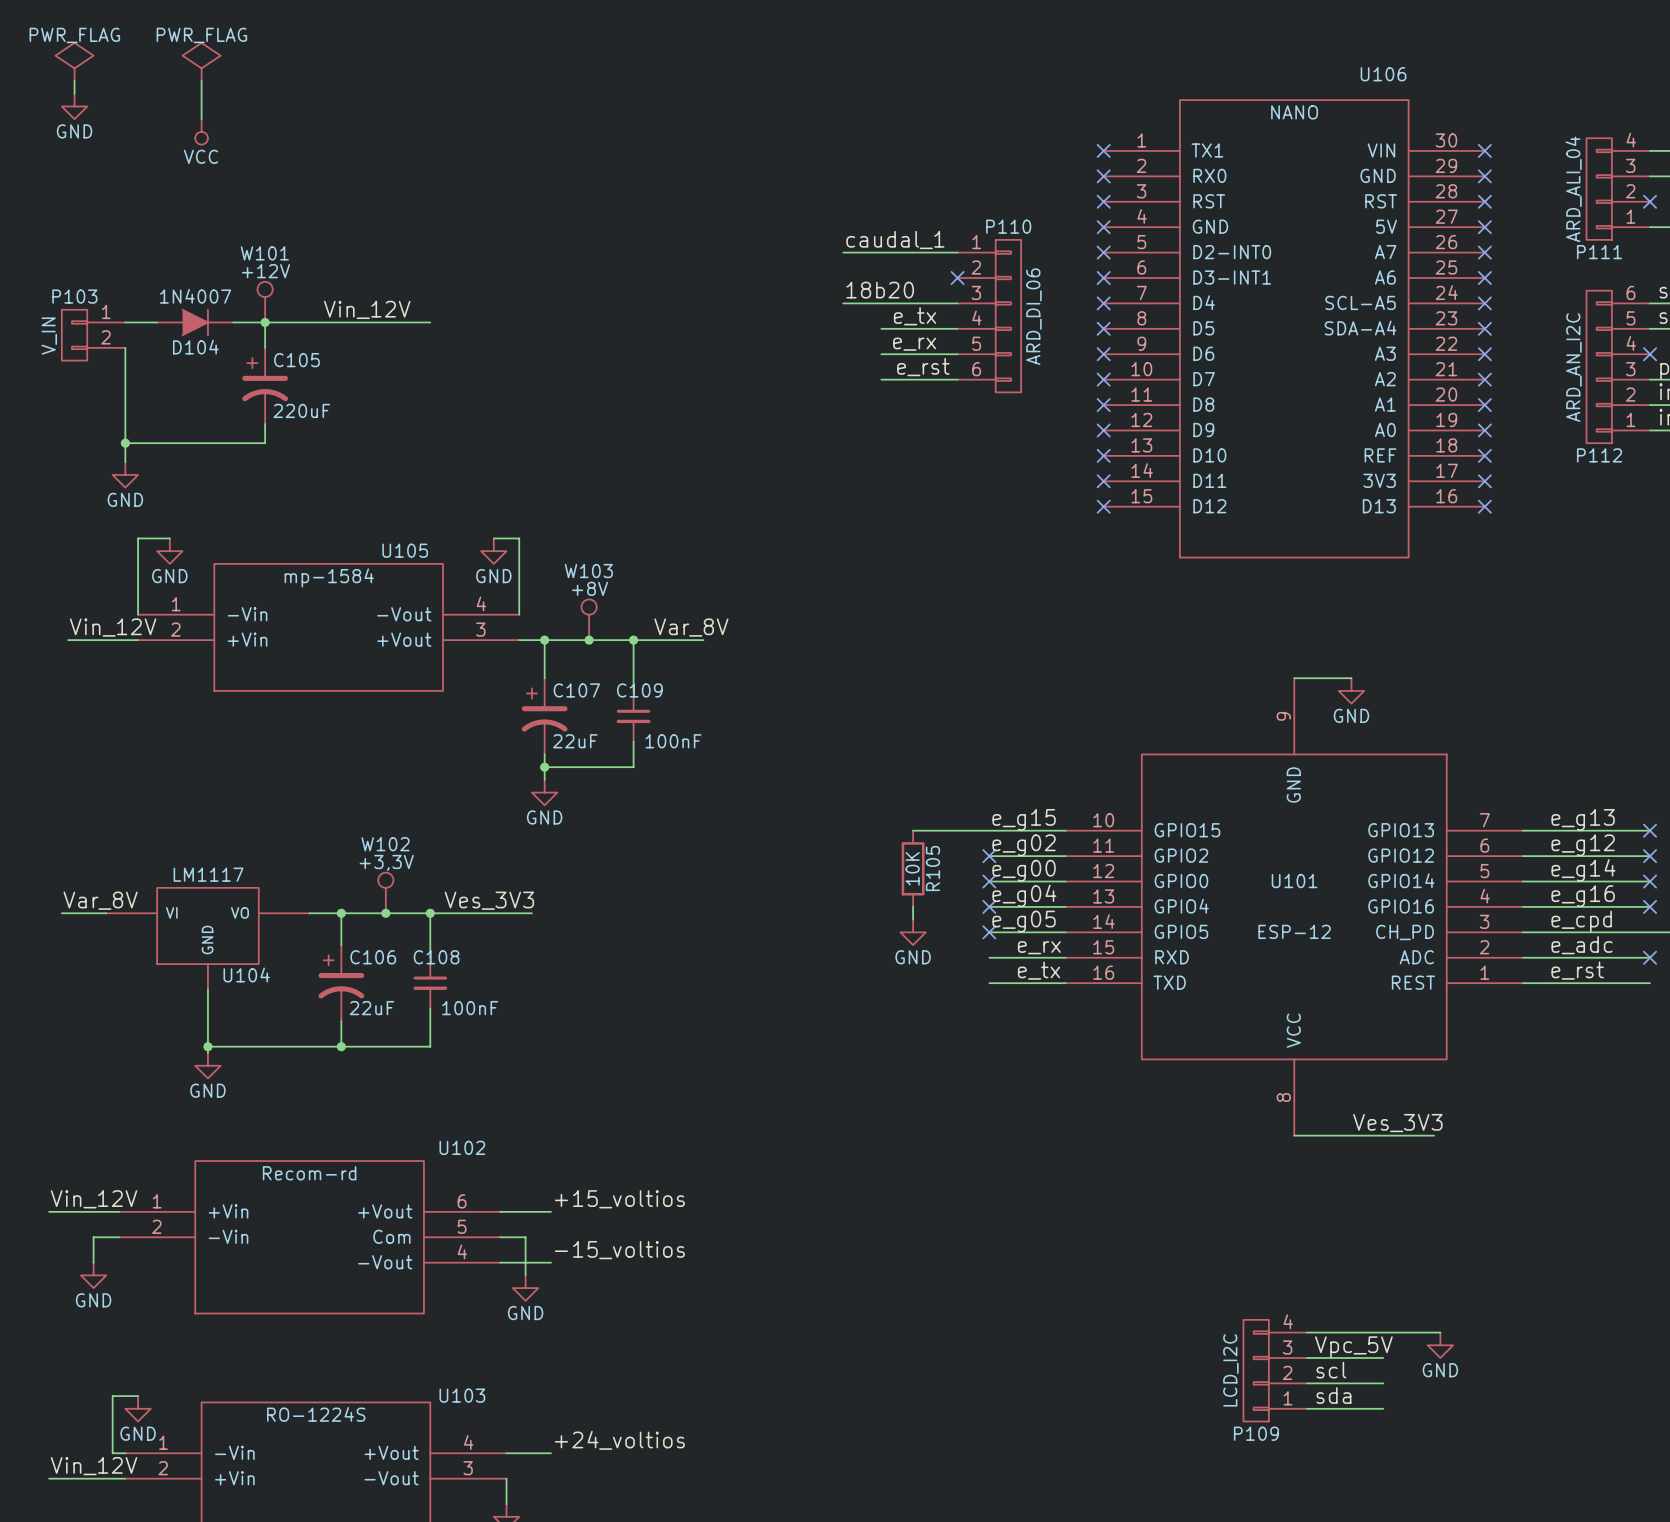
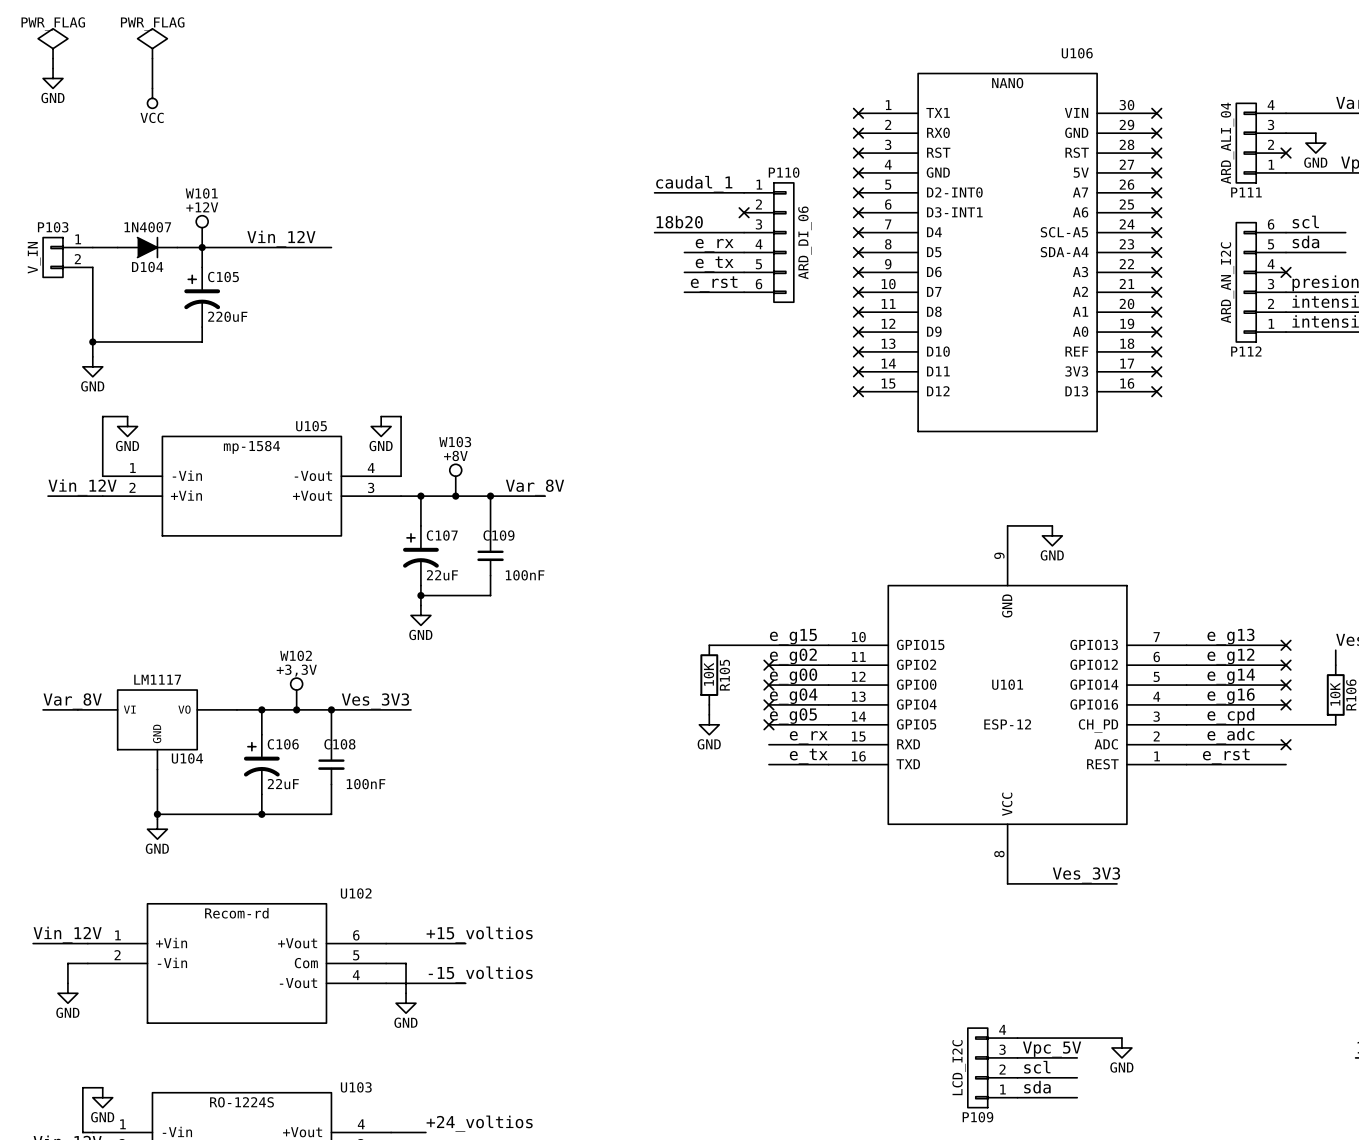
label: e_tx (915, 316) -> e_rx (714, 245)
label: e_rx (914, 344) -> e_tx (714, 264)
wire: none -> (425, 943) (465, 943)
wire: none -> (425, 983) (465, 983)

